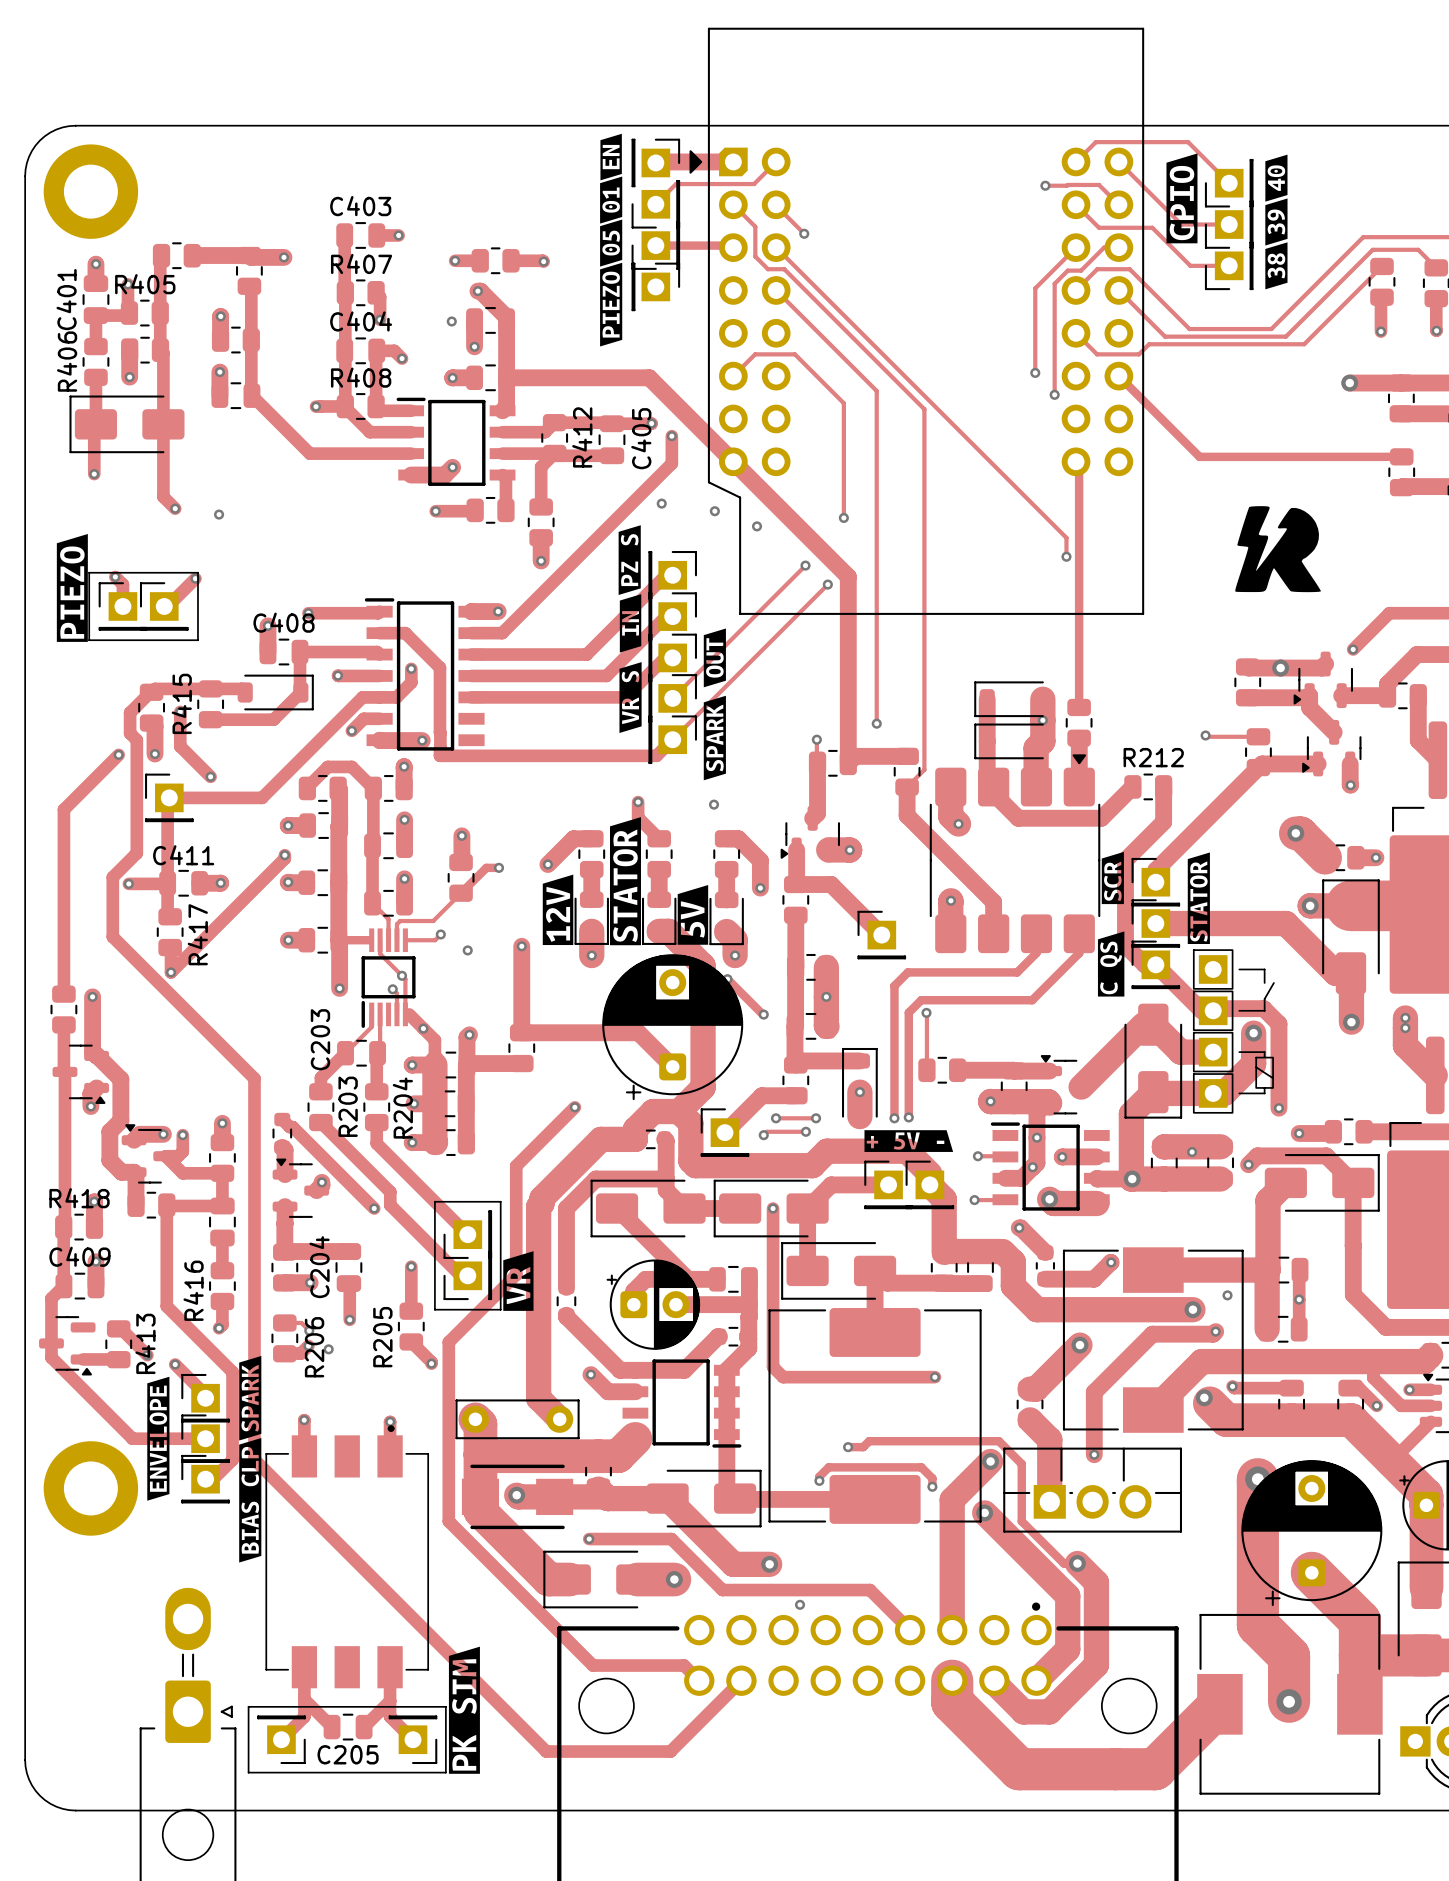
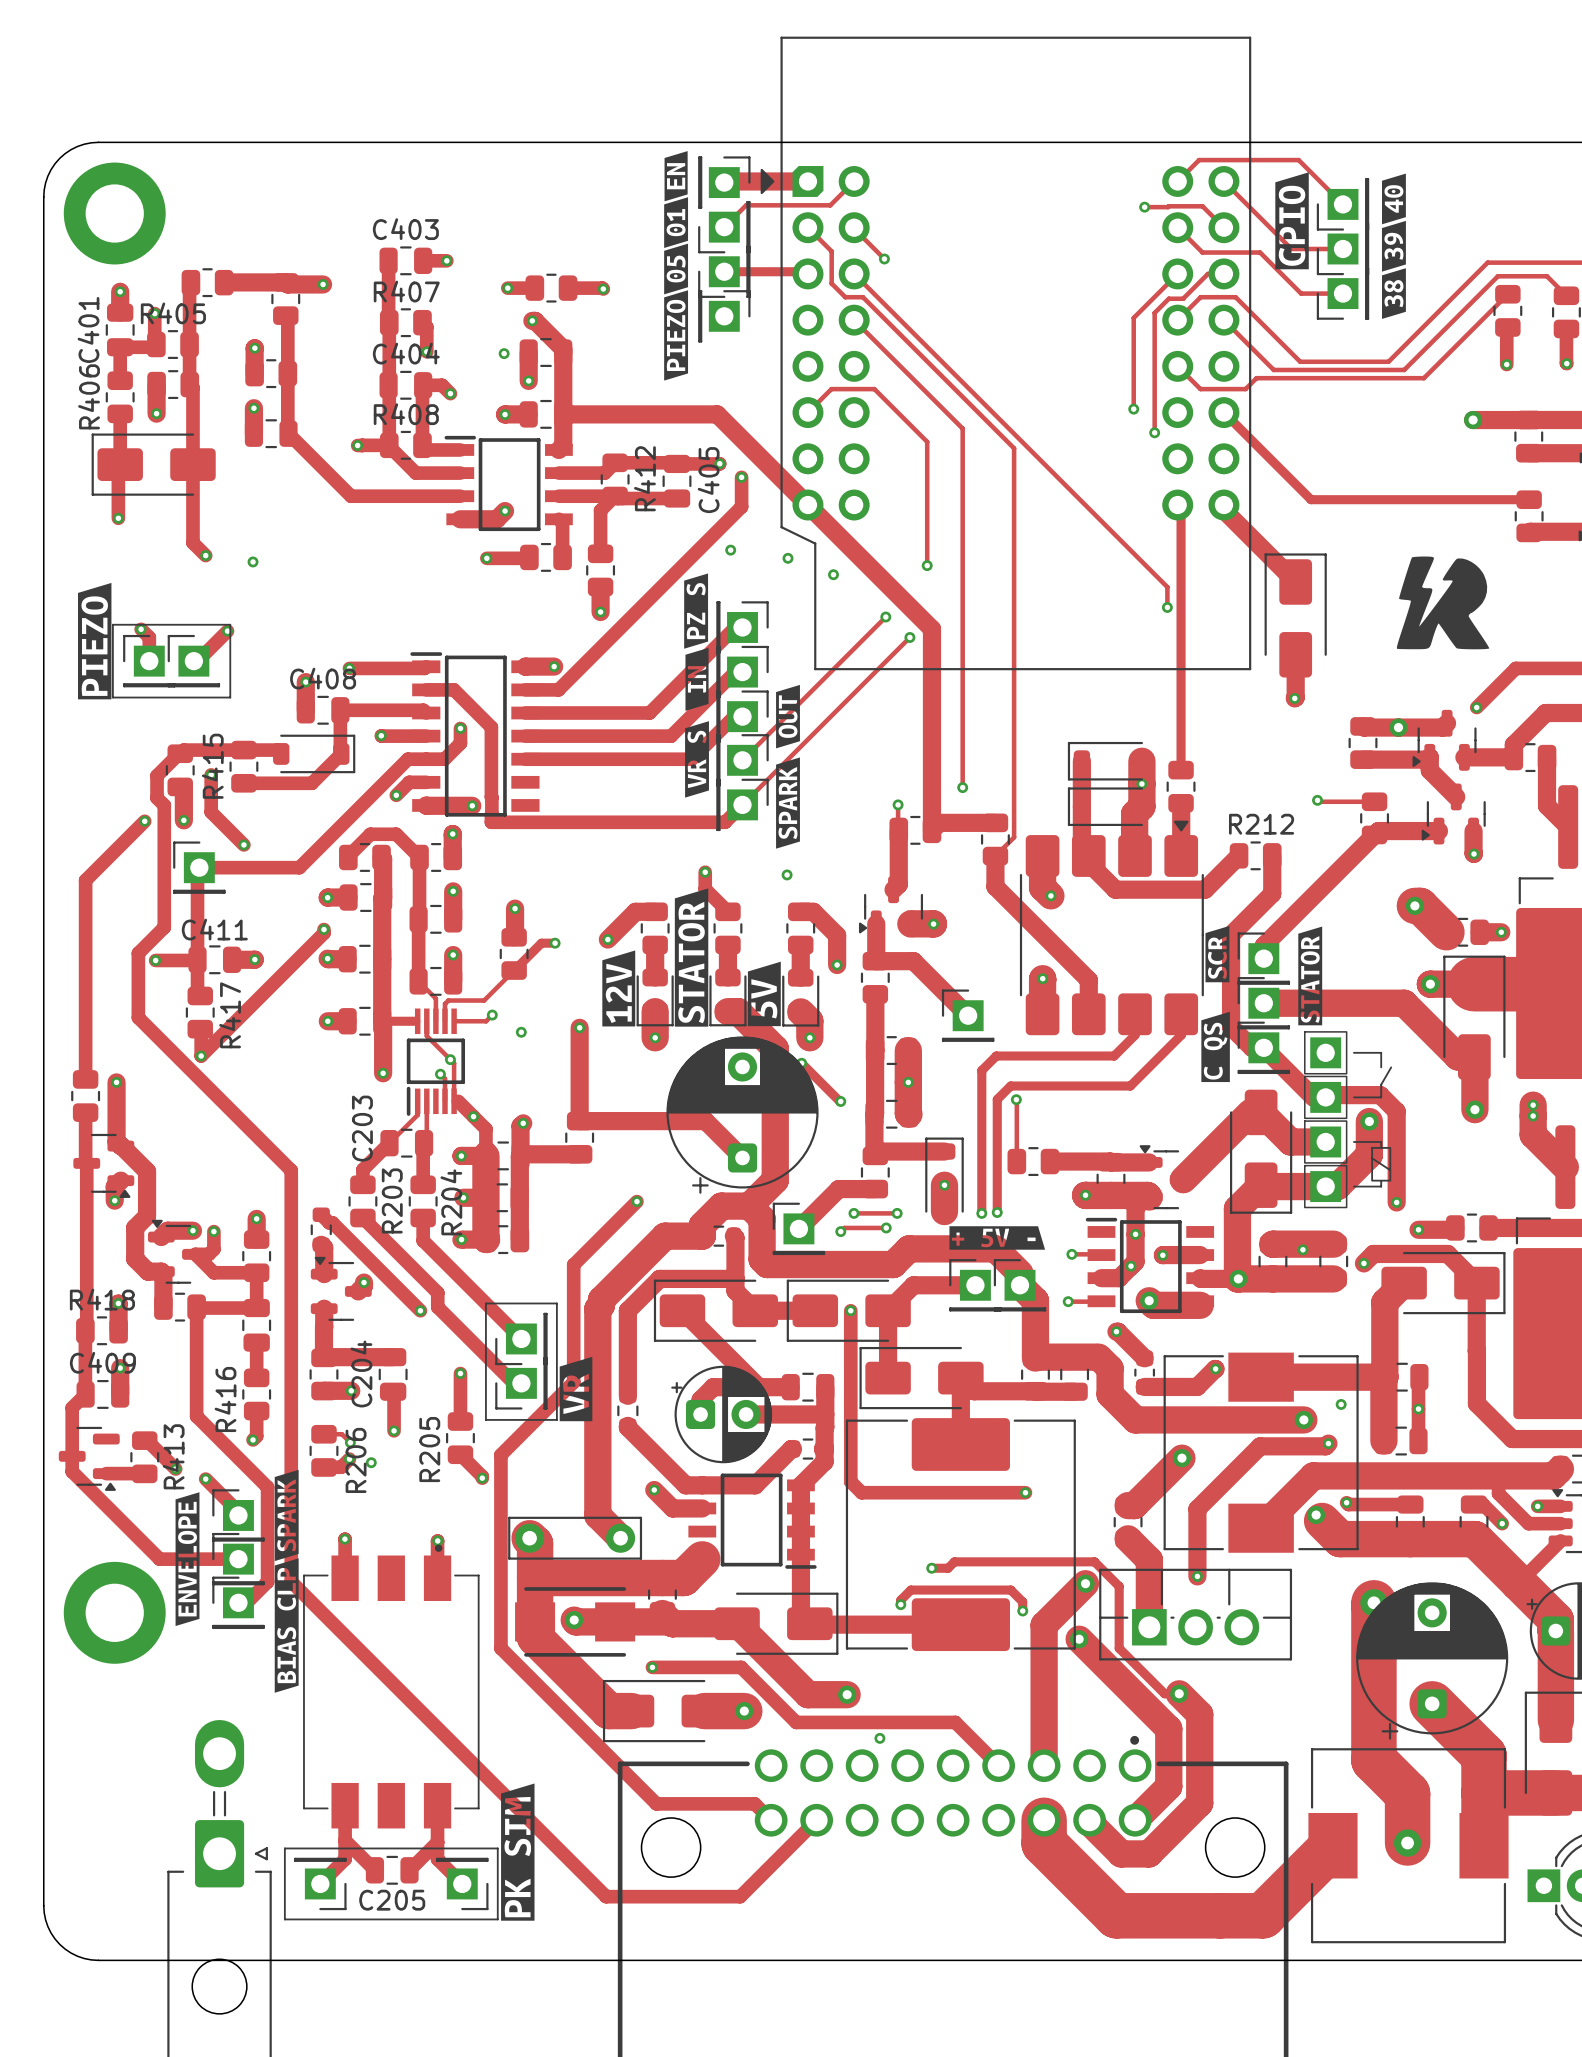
track: none -> (1223, 505) (1223, 510) (1295, 581)
drawing position: (1278, 549) -> (1443, 602)
part: none -> (1295, 615)
track: none -> (1295, 654) (1294, 698)
via: none -> (1294, 698)

